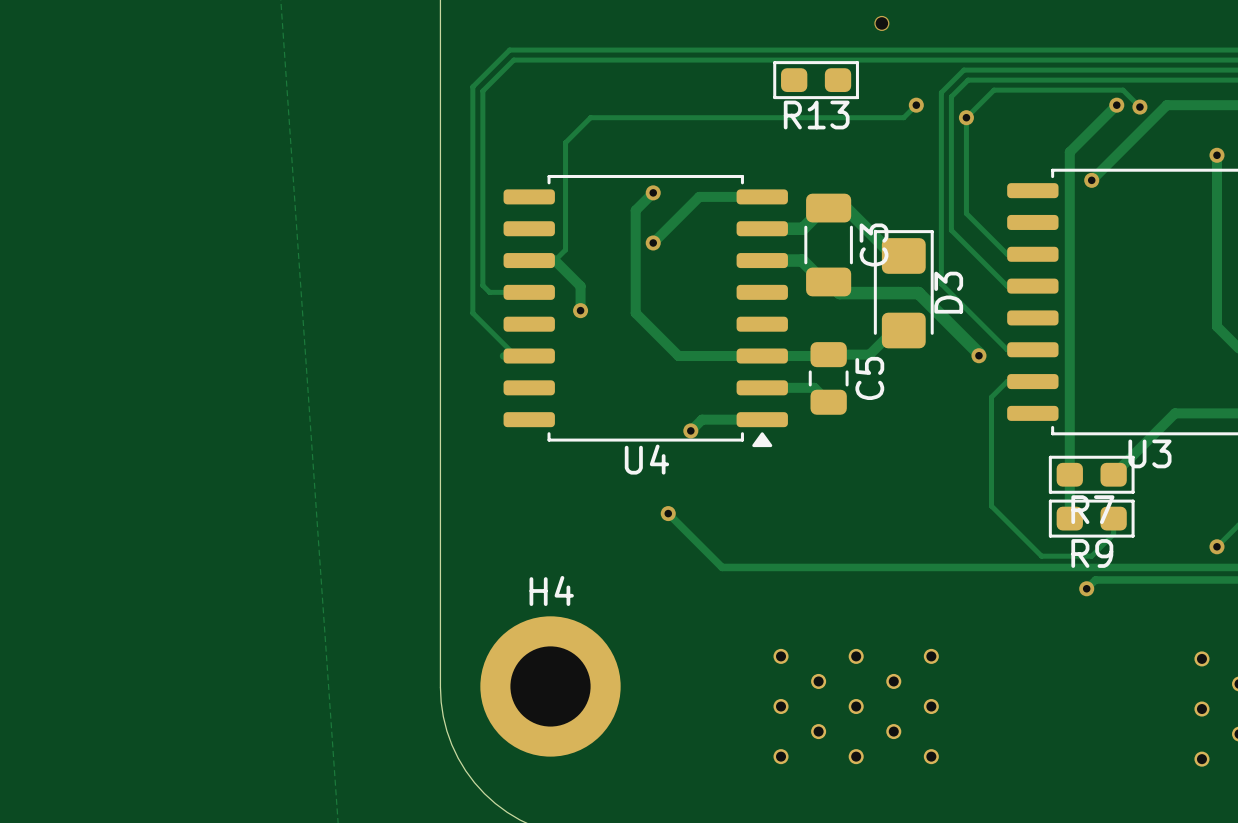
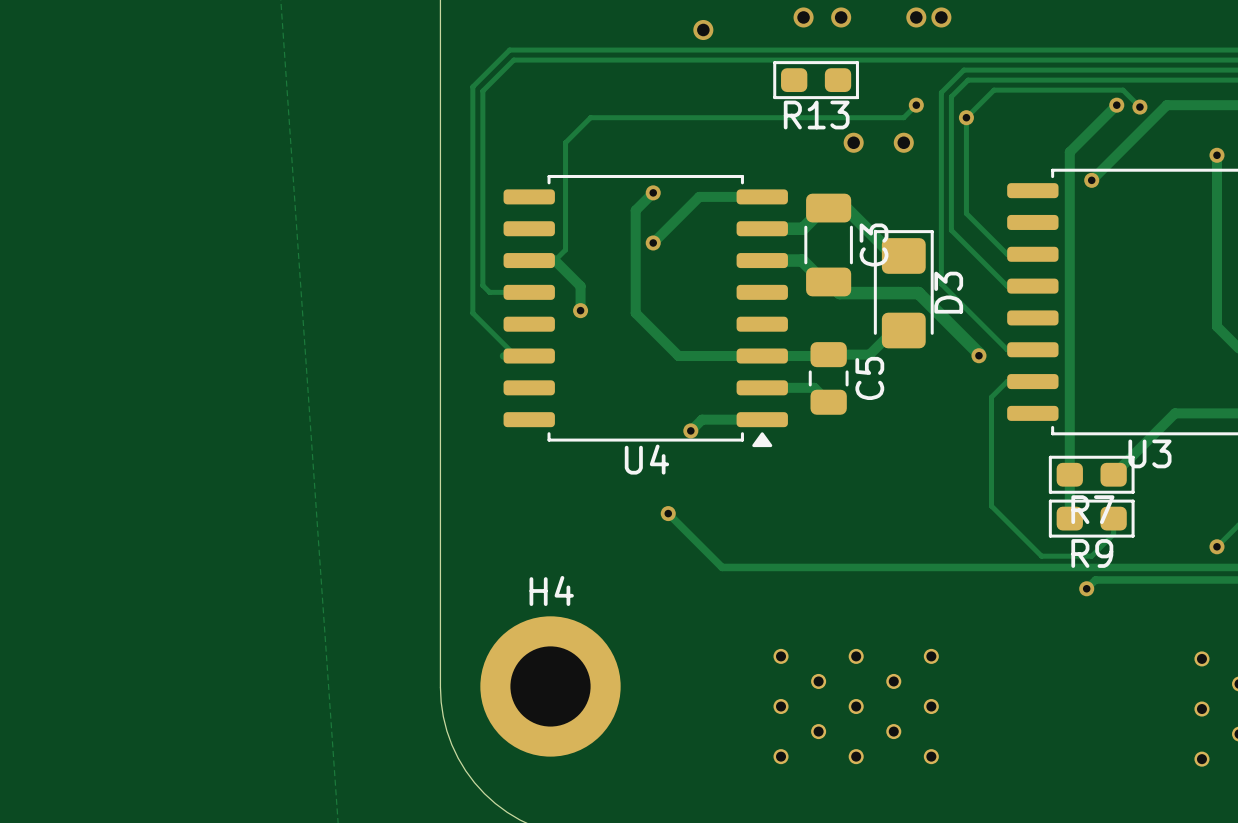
via: none -> (803, 17)
via: none -> (841, 17)
via: none -> (916, 17)
via: none -> (941, 17)
via: (881, 23) -> none
via: none -> (703, 30)
via: none -> (853, 142)
via: none -> (903, 142)

